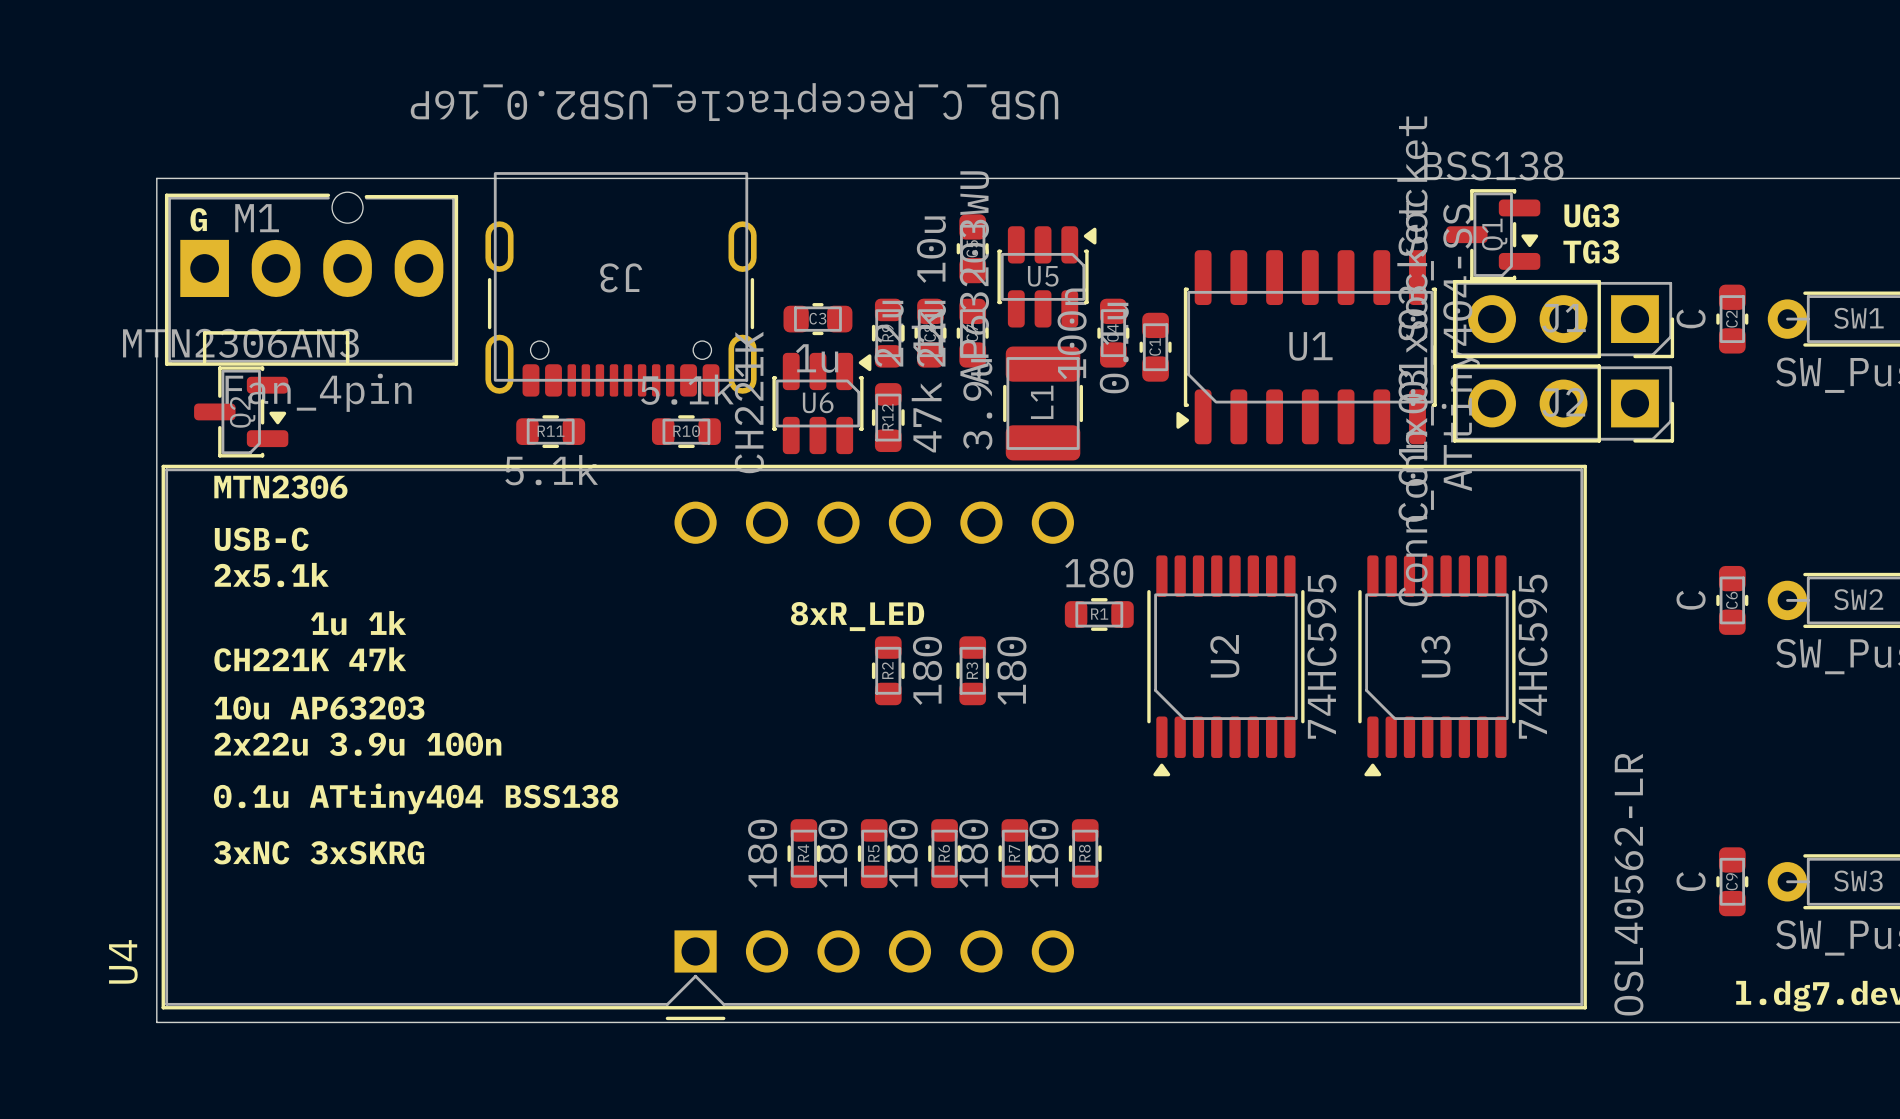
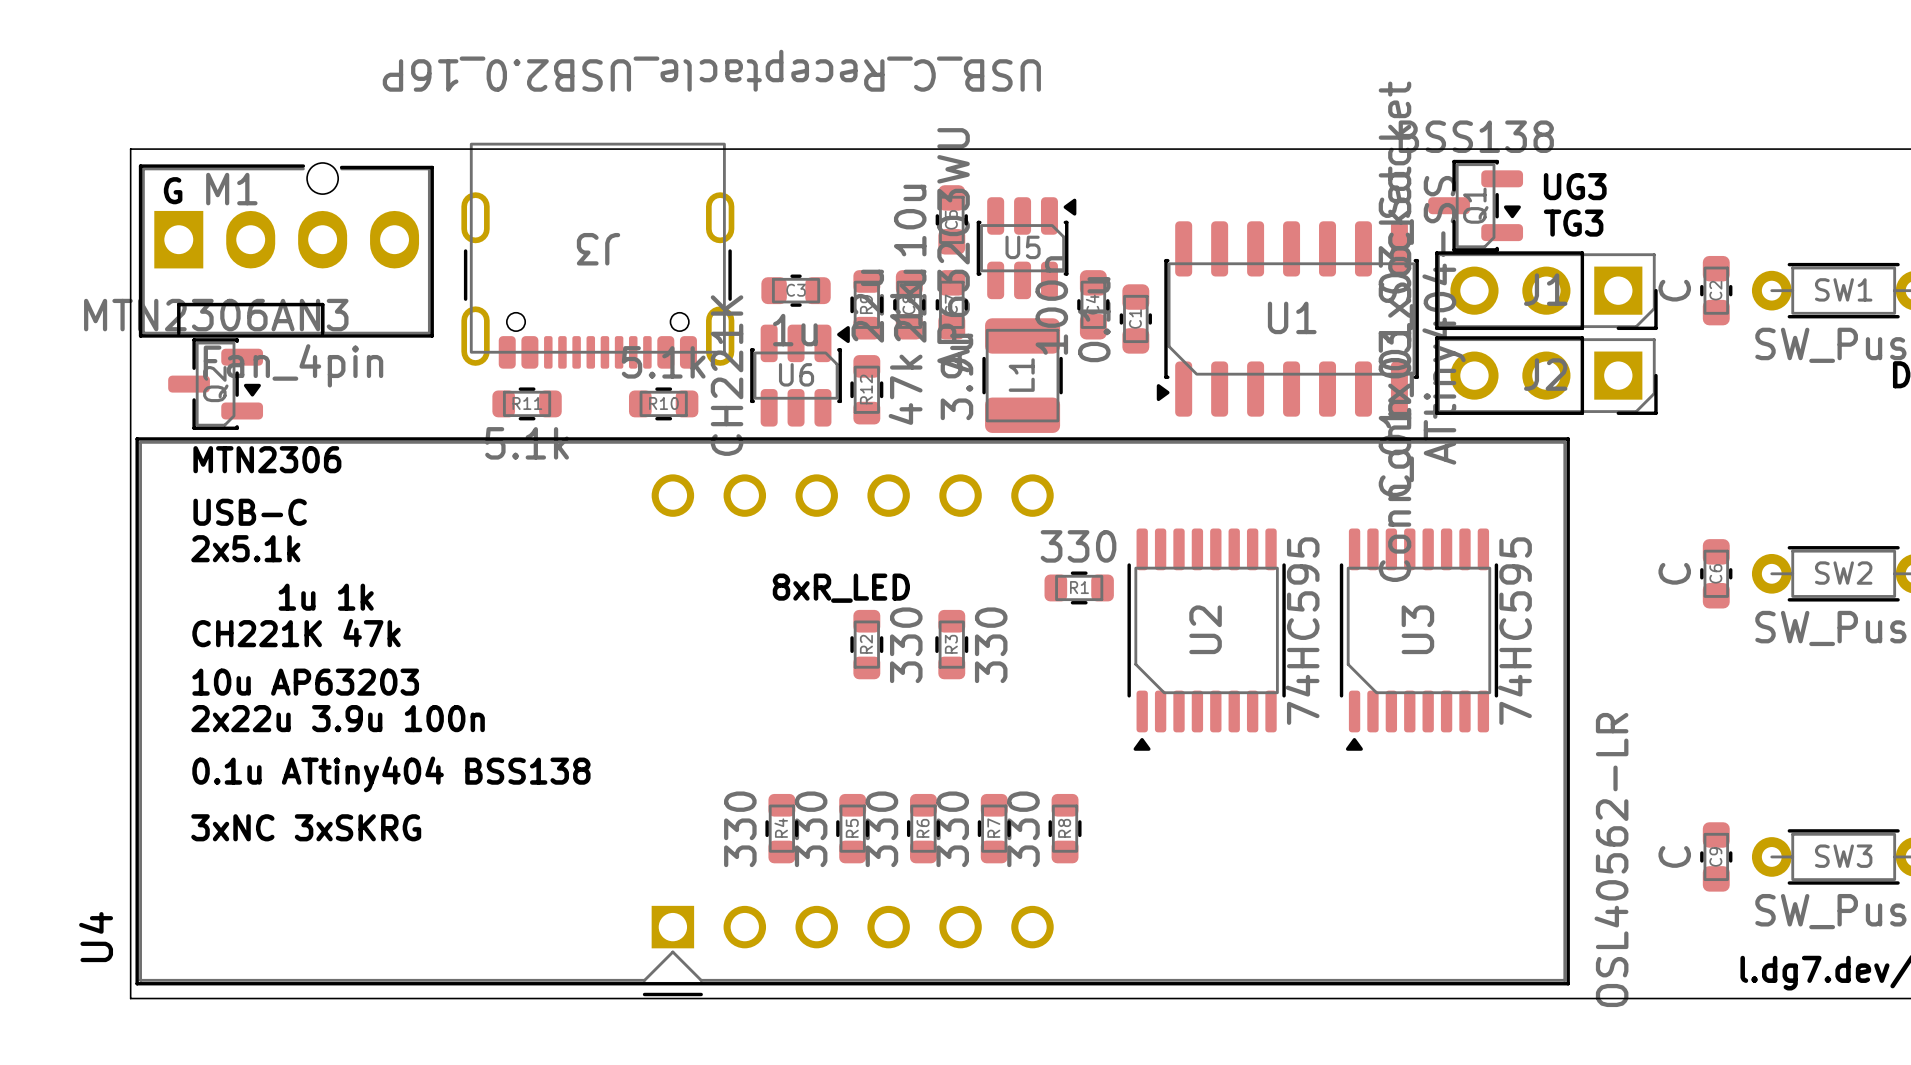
R1 value: 180 (1099, 573) -> 330 (1078, 546)
R2 value: 180 (927, 670) -> 330 (906, 645)
R3 value: 180 (1011, 670) -> 330 (991, 645)
R4 value: 180 (762, 853) -> 330 (740, 829)
R5 value: 180 (832, 853) -> 330 (811, 829)
R6 value: 180 (903, 853) -> 330 (881, 829)
R7 value: 180 (973, 853) -> 330 (952, 829)
R8 value: 180 (1043, 853) -> 330 (1023, 829)

